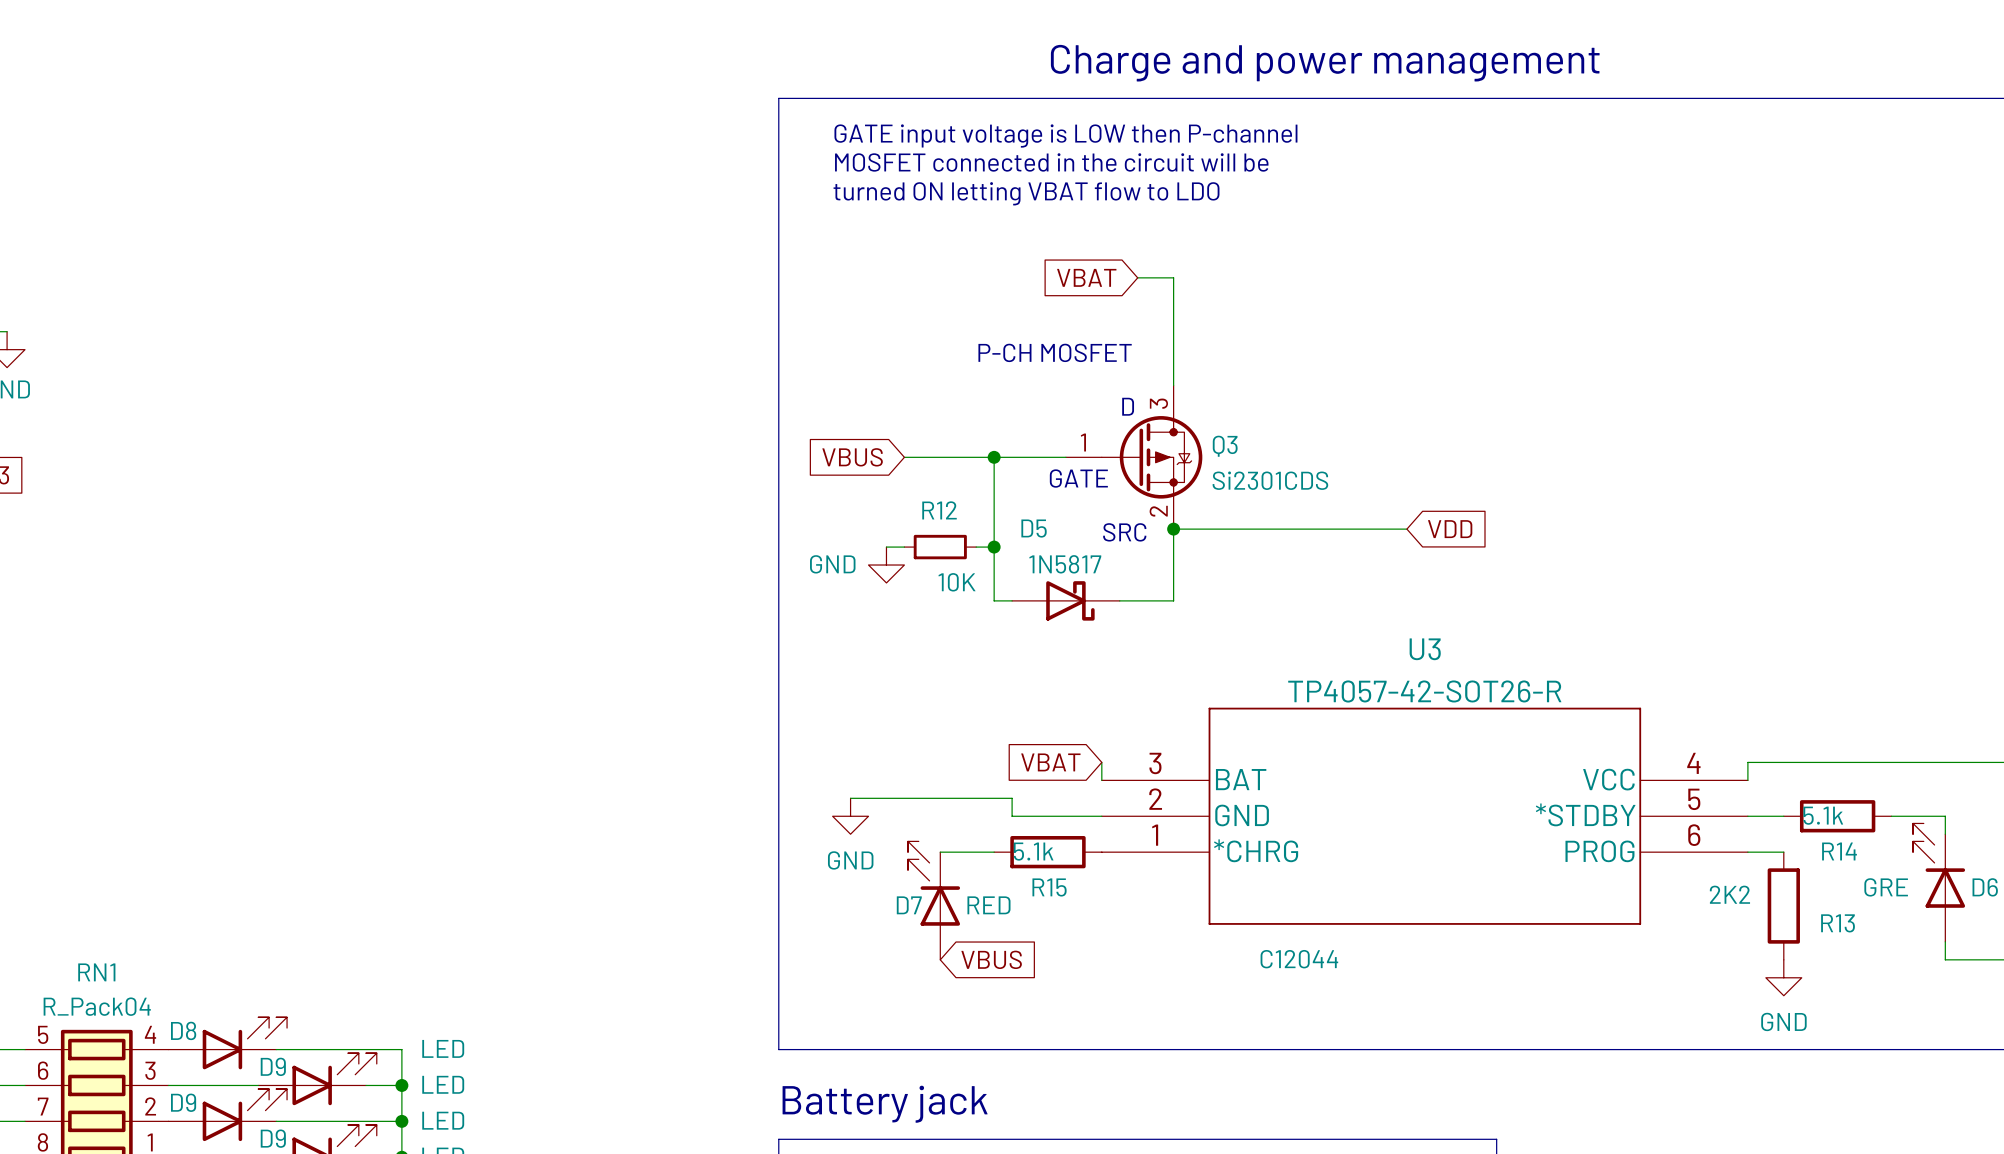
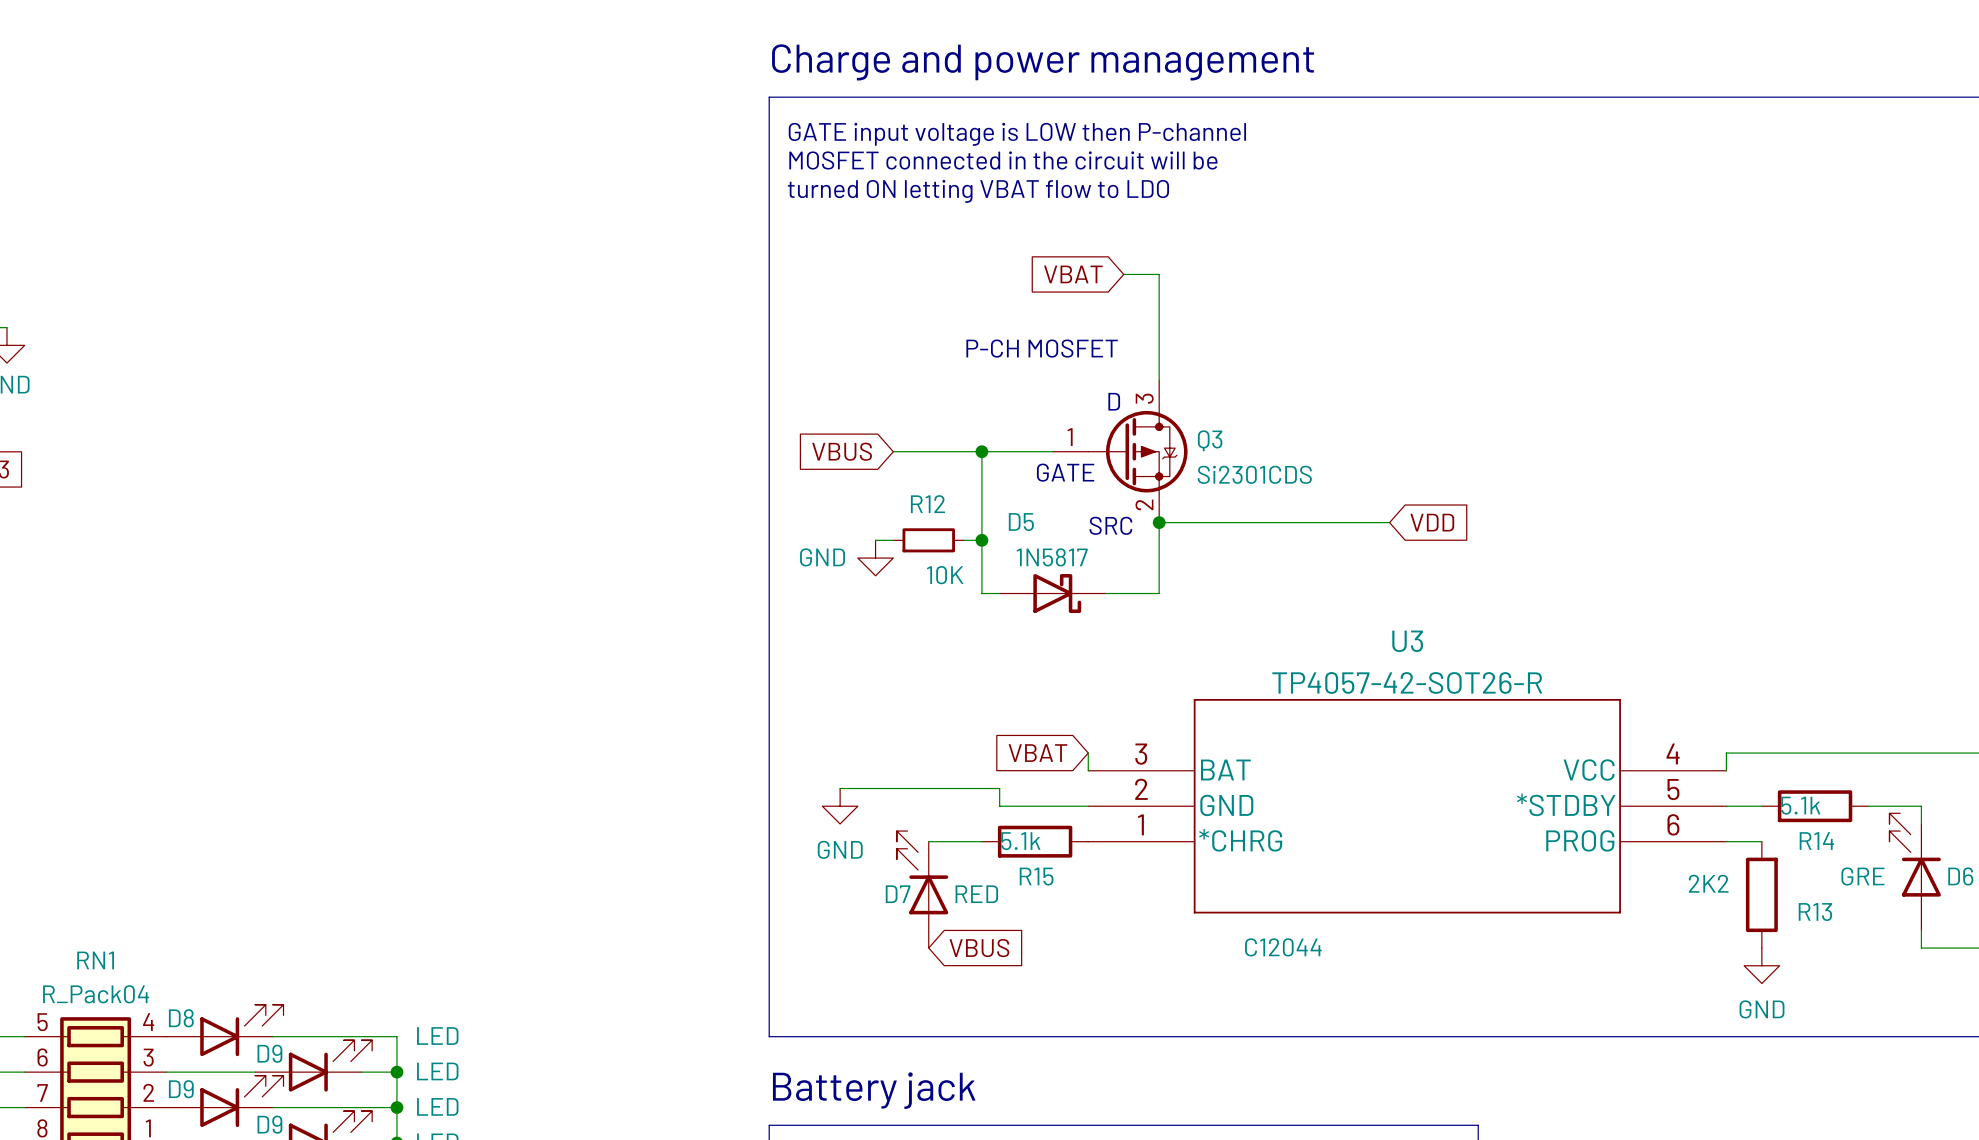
text position: Charge and power management (1325, 63) -> Charge and power management (1043, 62)
text position: GATE input voltage is LOW then P-channel (1065, 136) -> GATE input voltage is LOW then P-channel (1017, 134)
text position: MOSFET connected in the circuit will be (1051, 162) -> MOSFET connected in the circuit will be (1003, 160)
text position: turned ON letting VBAT flow to LDO (1026, 193) -> turned ON letting VBAT flow to LDO (978, 191)

